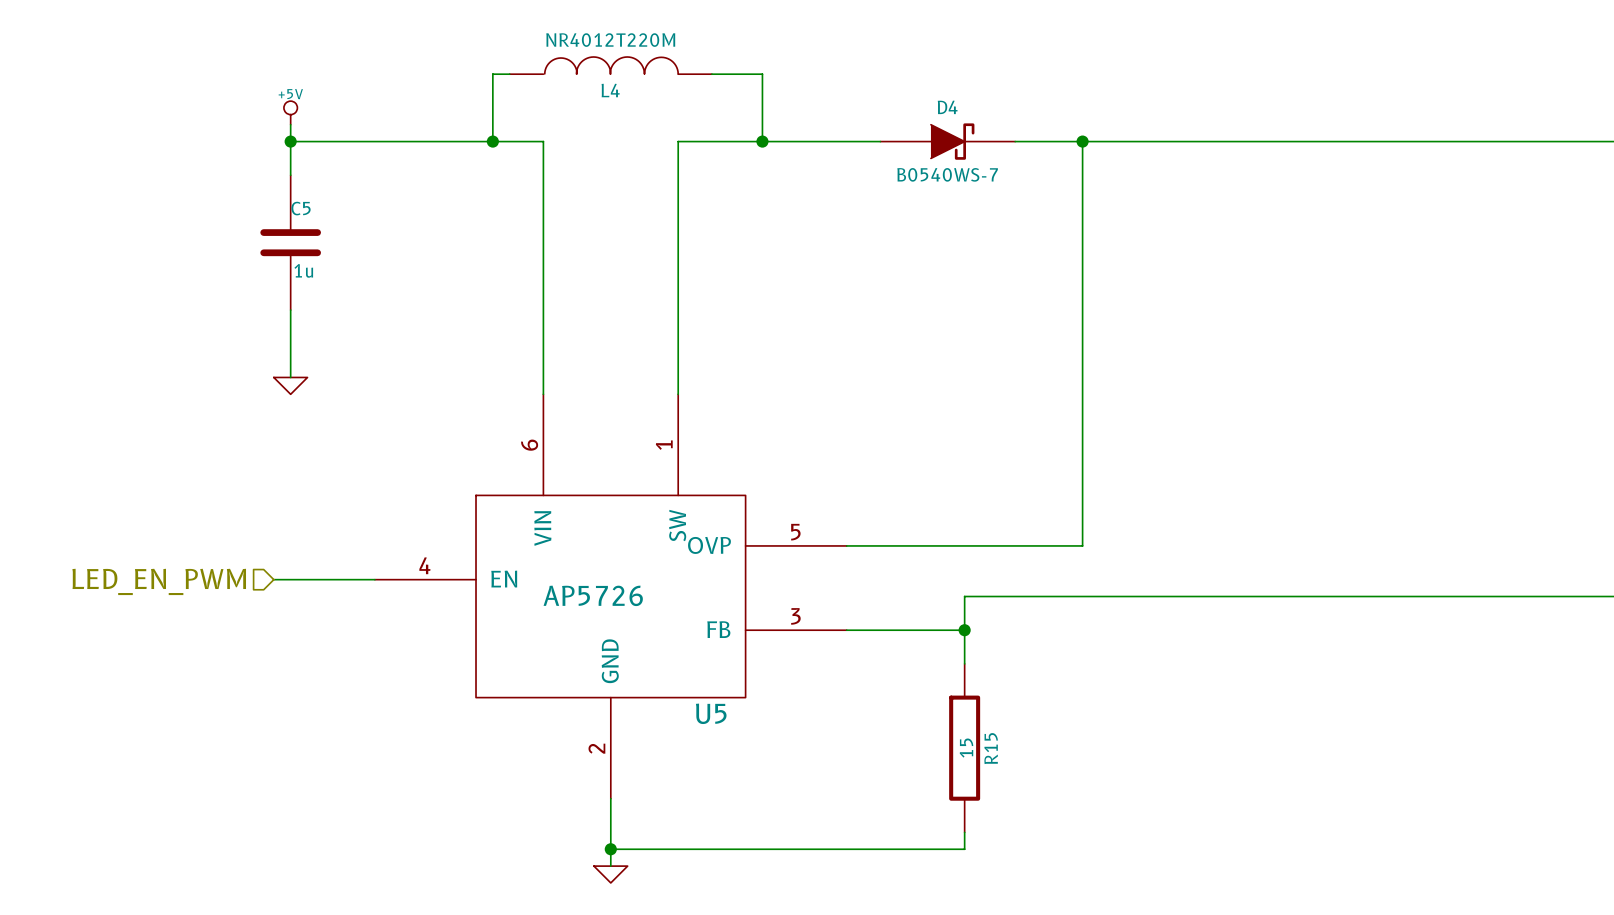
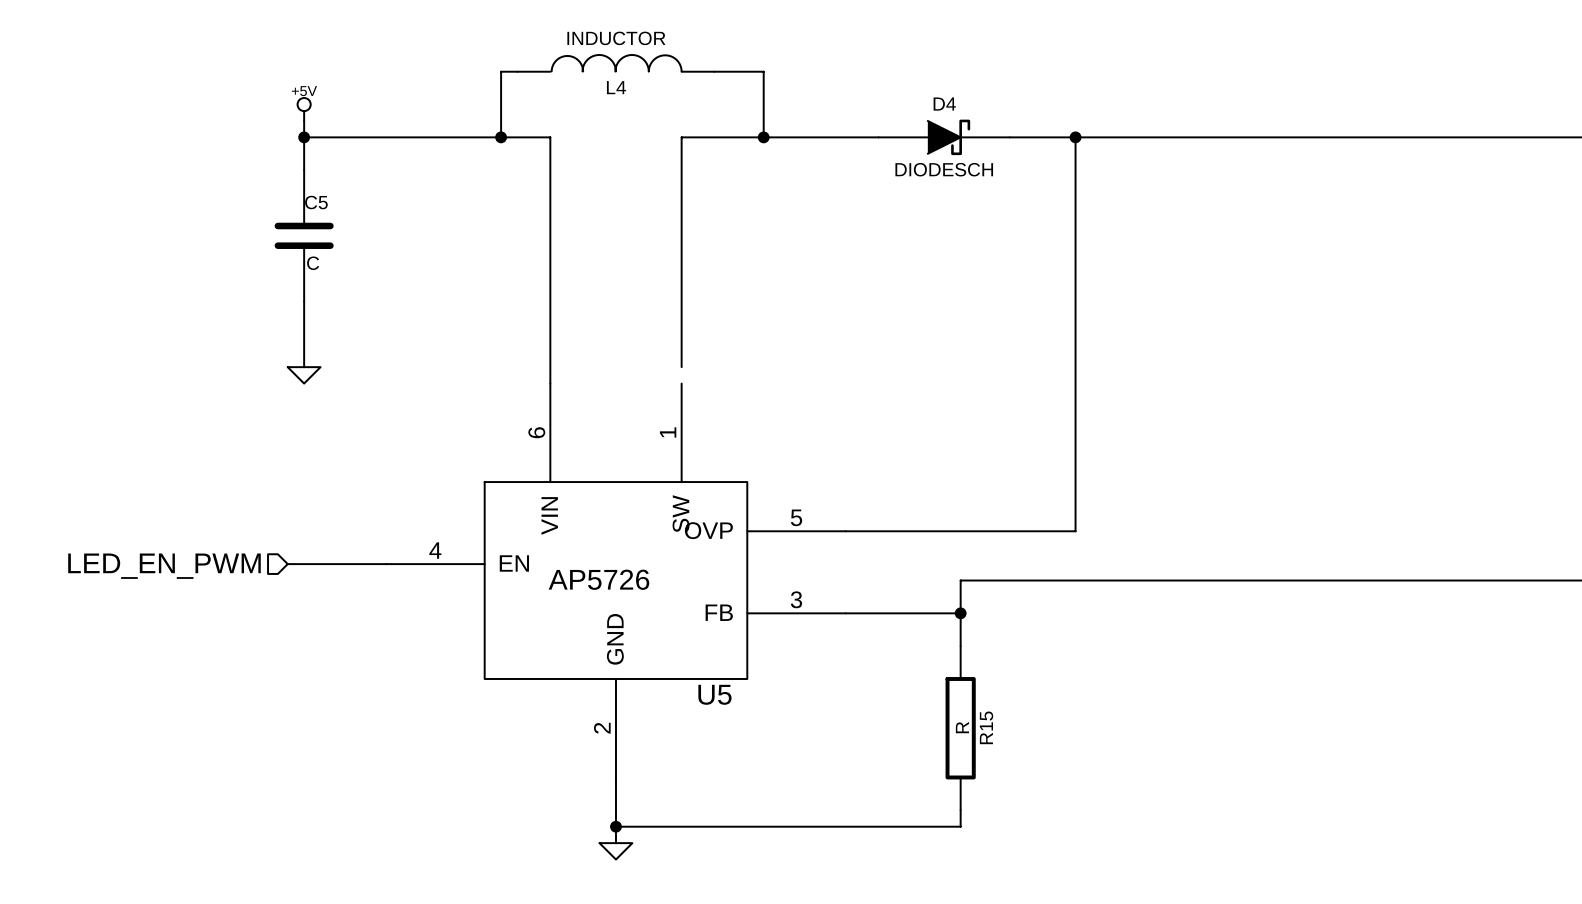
L4 value: NR4012T220M (610, 40) -> INDUCTOR (616, 38)
D4 value: B0540WS-7 (947, 174) -> DIODESCH (944, 169)
C5 value: 1u (303, 270) -> C (313, 263)
wire: (678, 377) (678, 394) -> none
R15 value: 15 (966, 748) -> R (962, 727)

